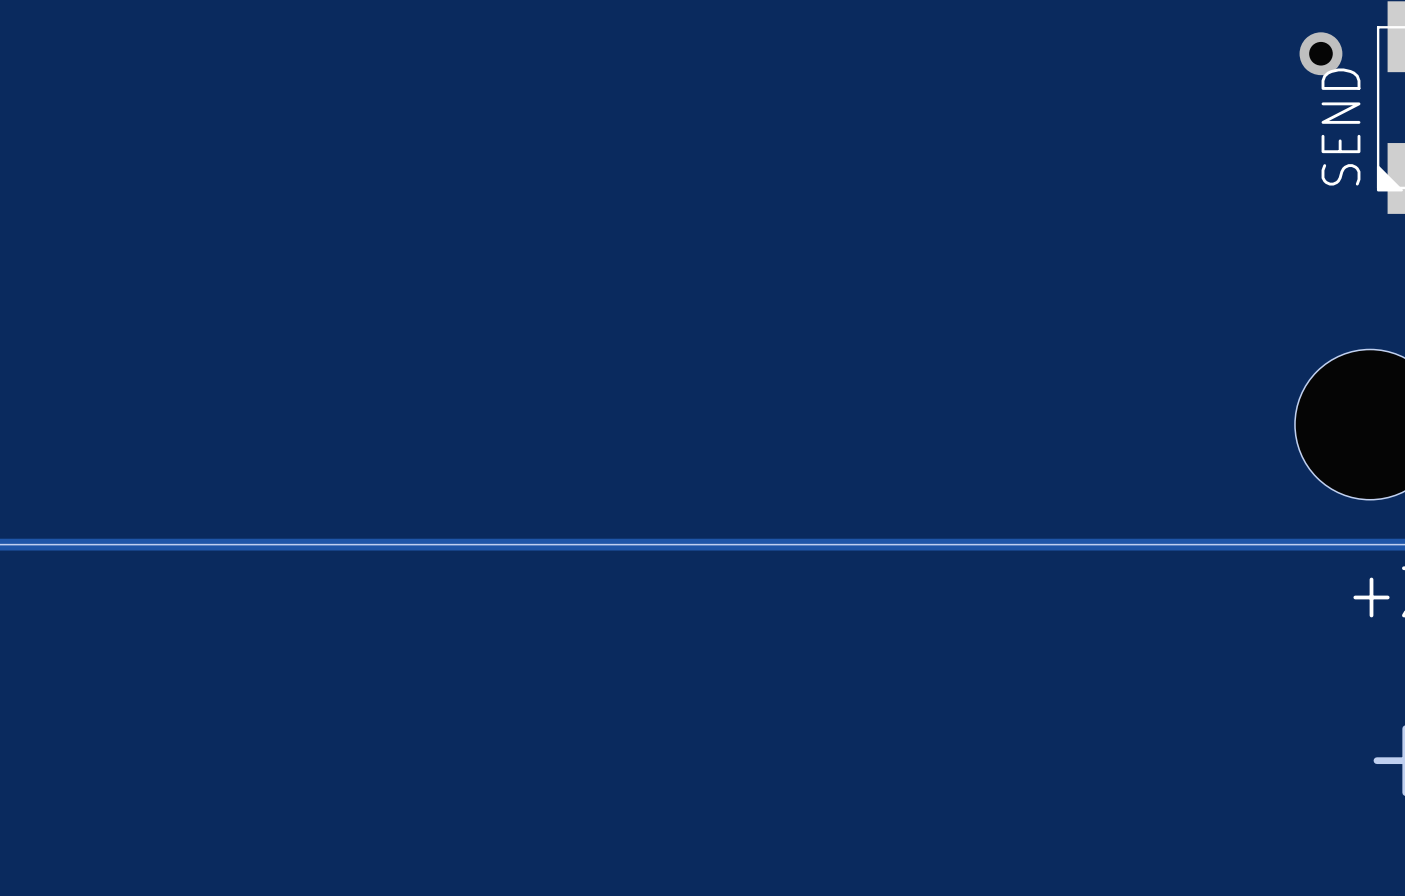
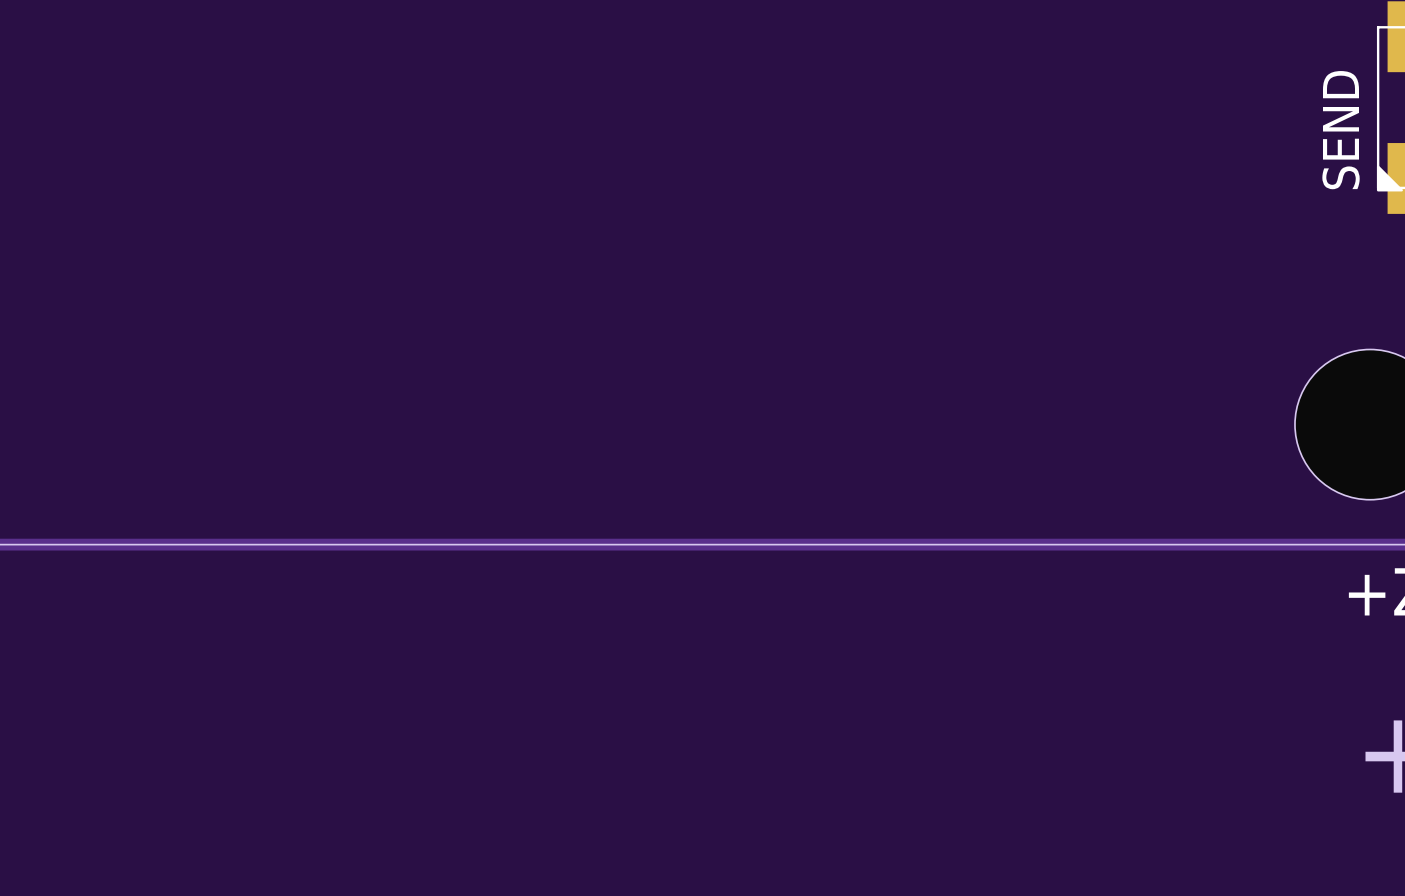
via: (1320, 53) -> none

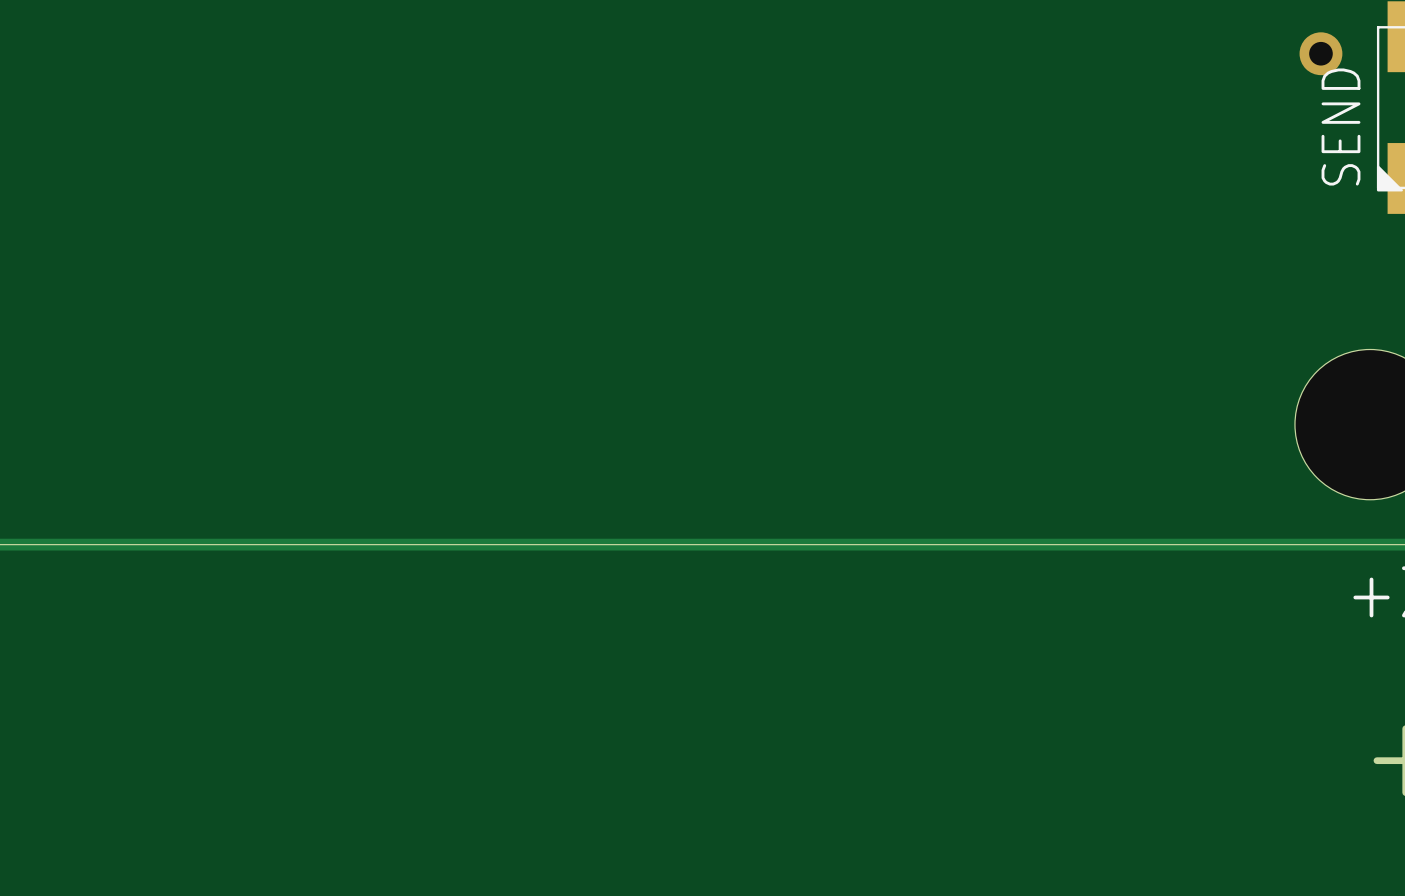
via: none -> (1320, 53)

